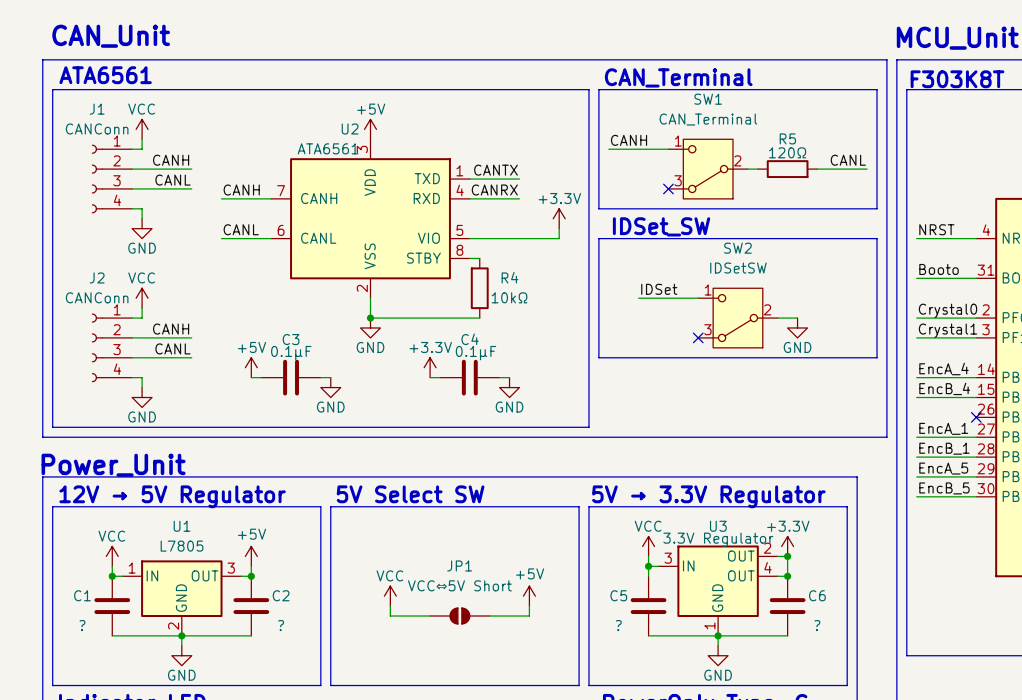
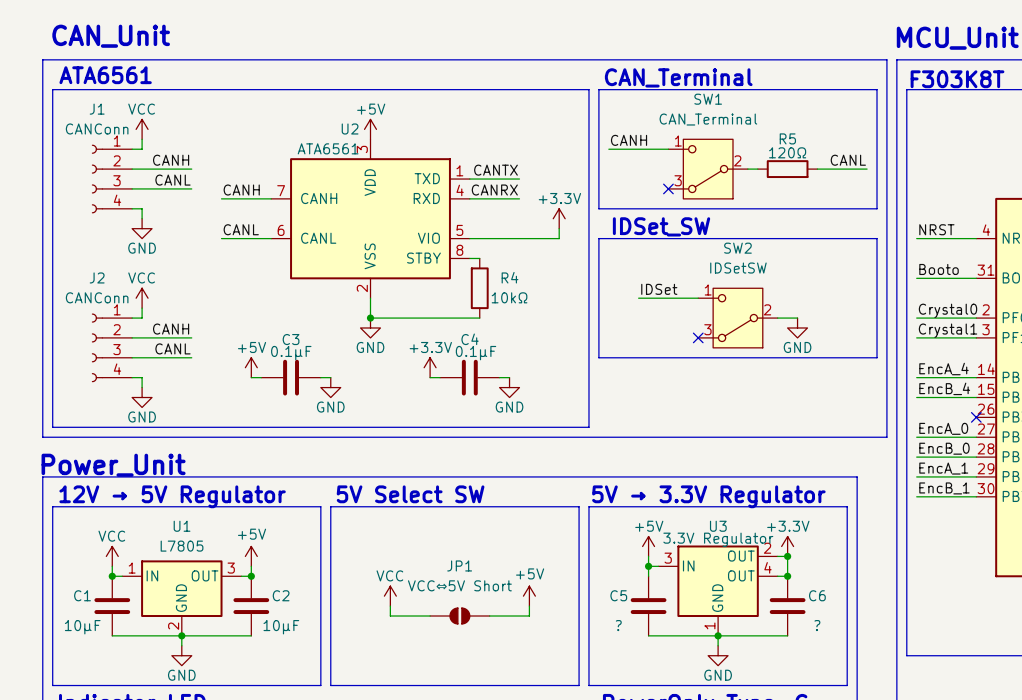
label: EncA_1 (943, 428) -> EncA_0 (943, 428)
label: EncB_1 (944, 448) -> EncB_0 (944, 448)
label: EncA_5 (943, 468) -> EncA_1 (943, 468)
label: EncB_5 (944, 488) -> EncB_1 (944, 488)
power symbol: VCC (648, 546) -> +5V (648, 546)
C1 value: ? (82, 625) -> 10μF (82, 627)
C2 value: ? (281, 625) -> 10μF (281, 627)

